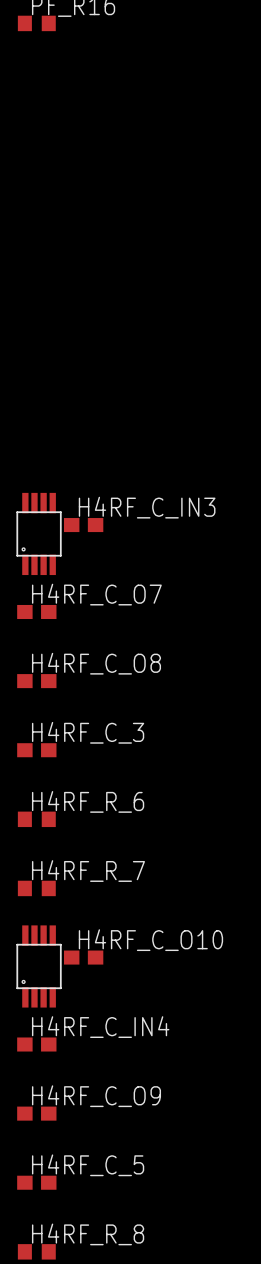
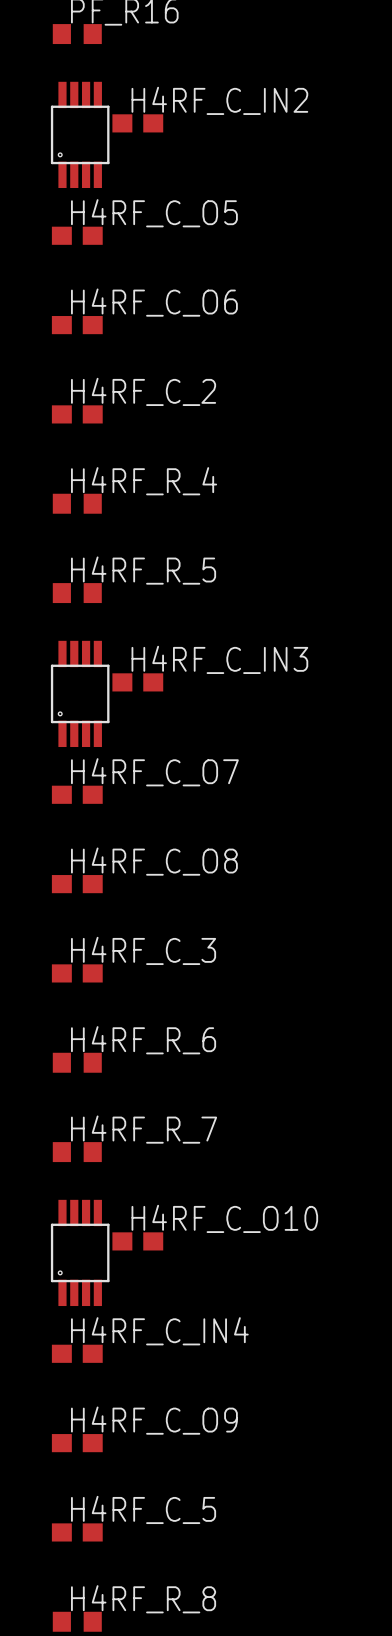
H4RF_C_IN2: none -> (137, 123)
part: none -> (80, 134)
H4RF_C_O5: none -> (77, 235)
H4RF_C_O6: none -> (77, 325)
H4RF_C_2: none -> (77, 414)
H4RF_R_4: none -> (77, 503)
H4RF_R_5: none -> (77, 593)

